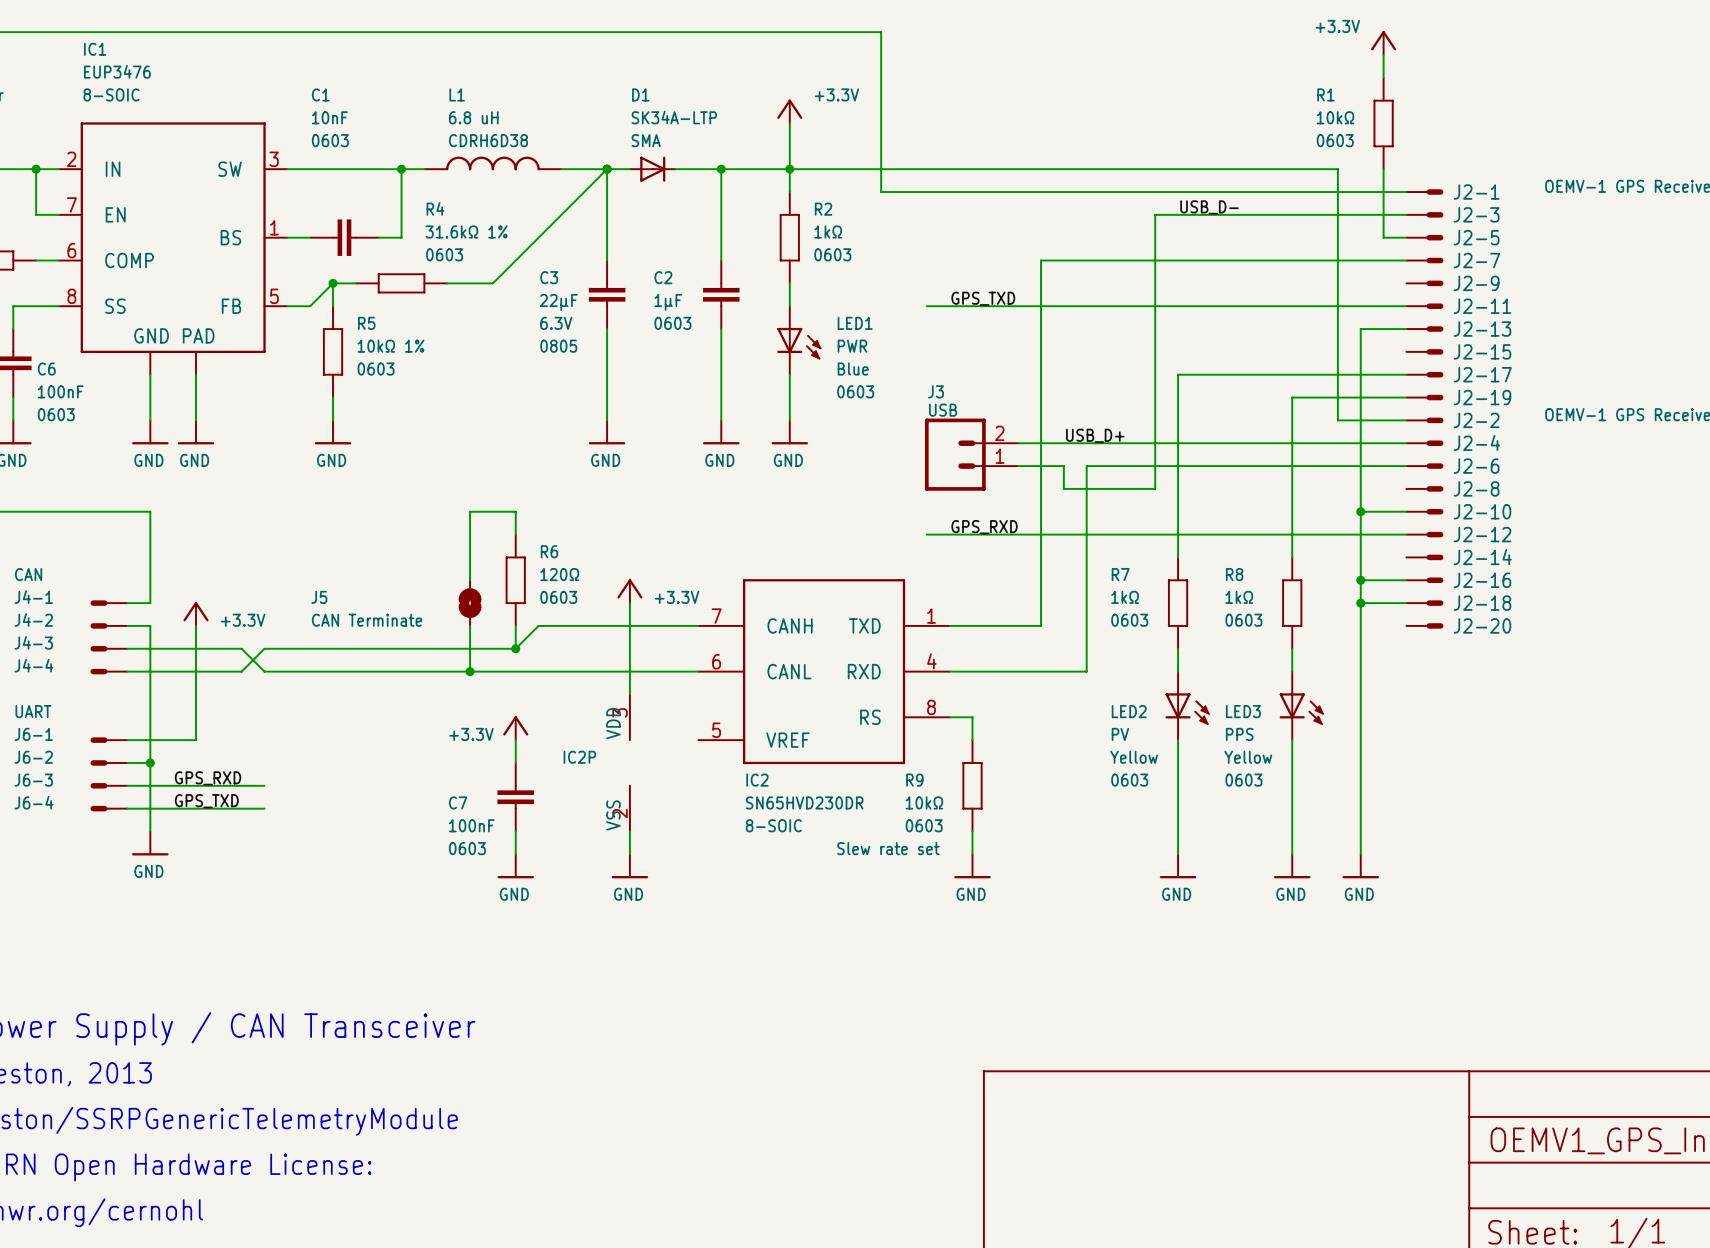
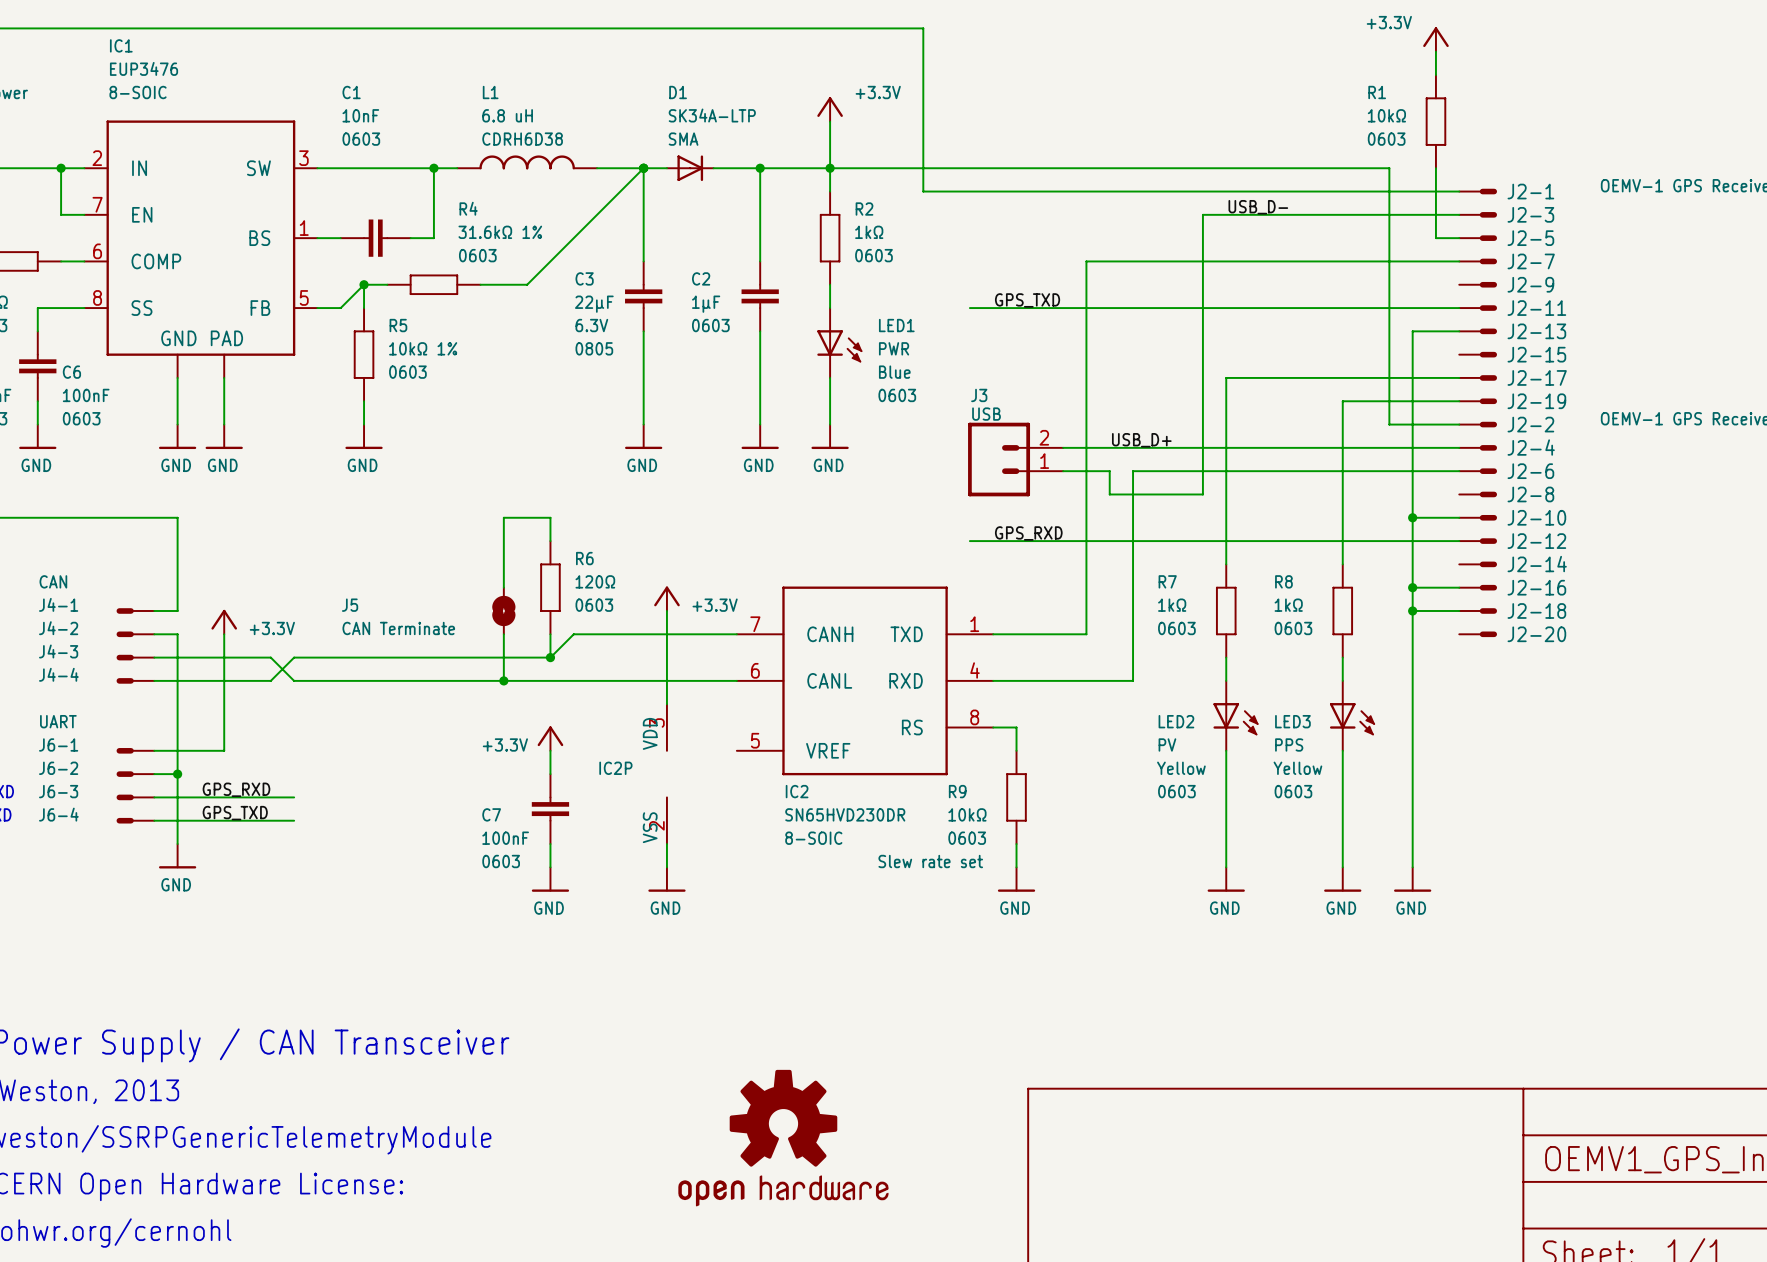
part: none -> (783, 1138)

